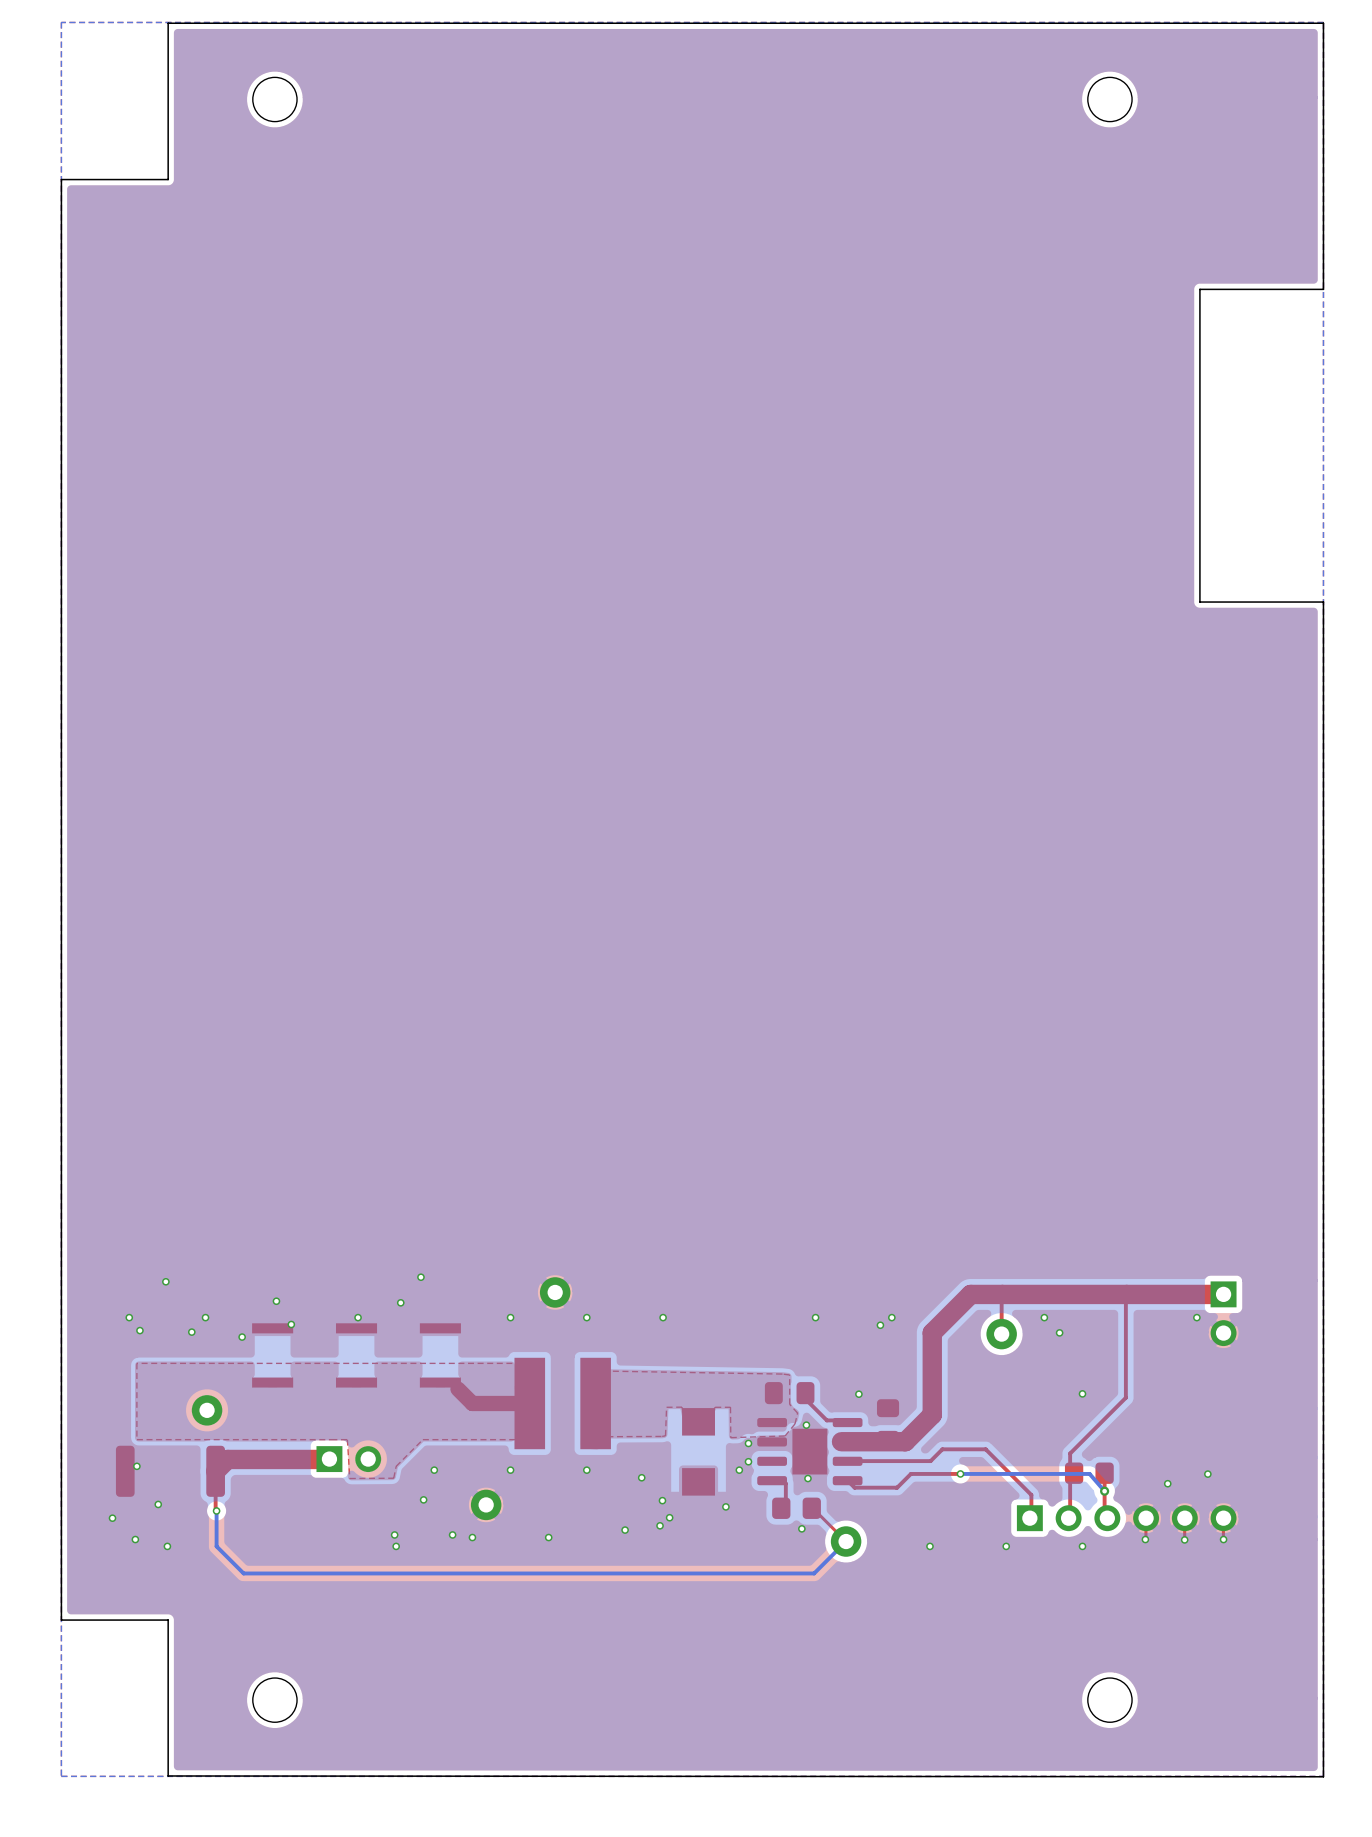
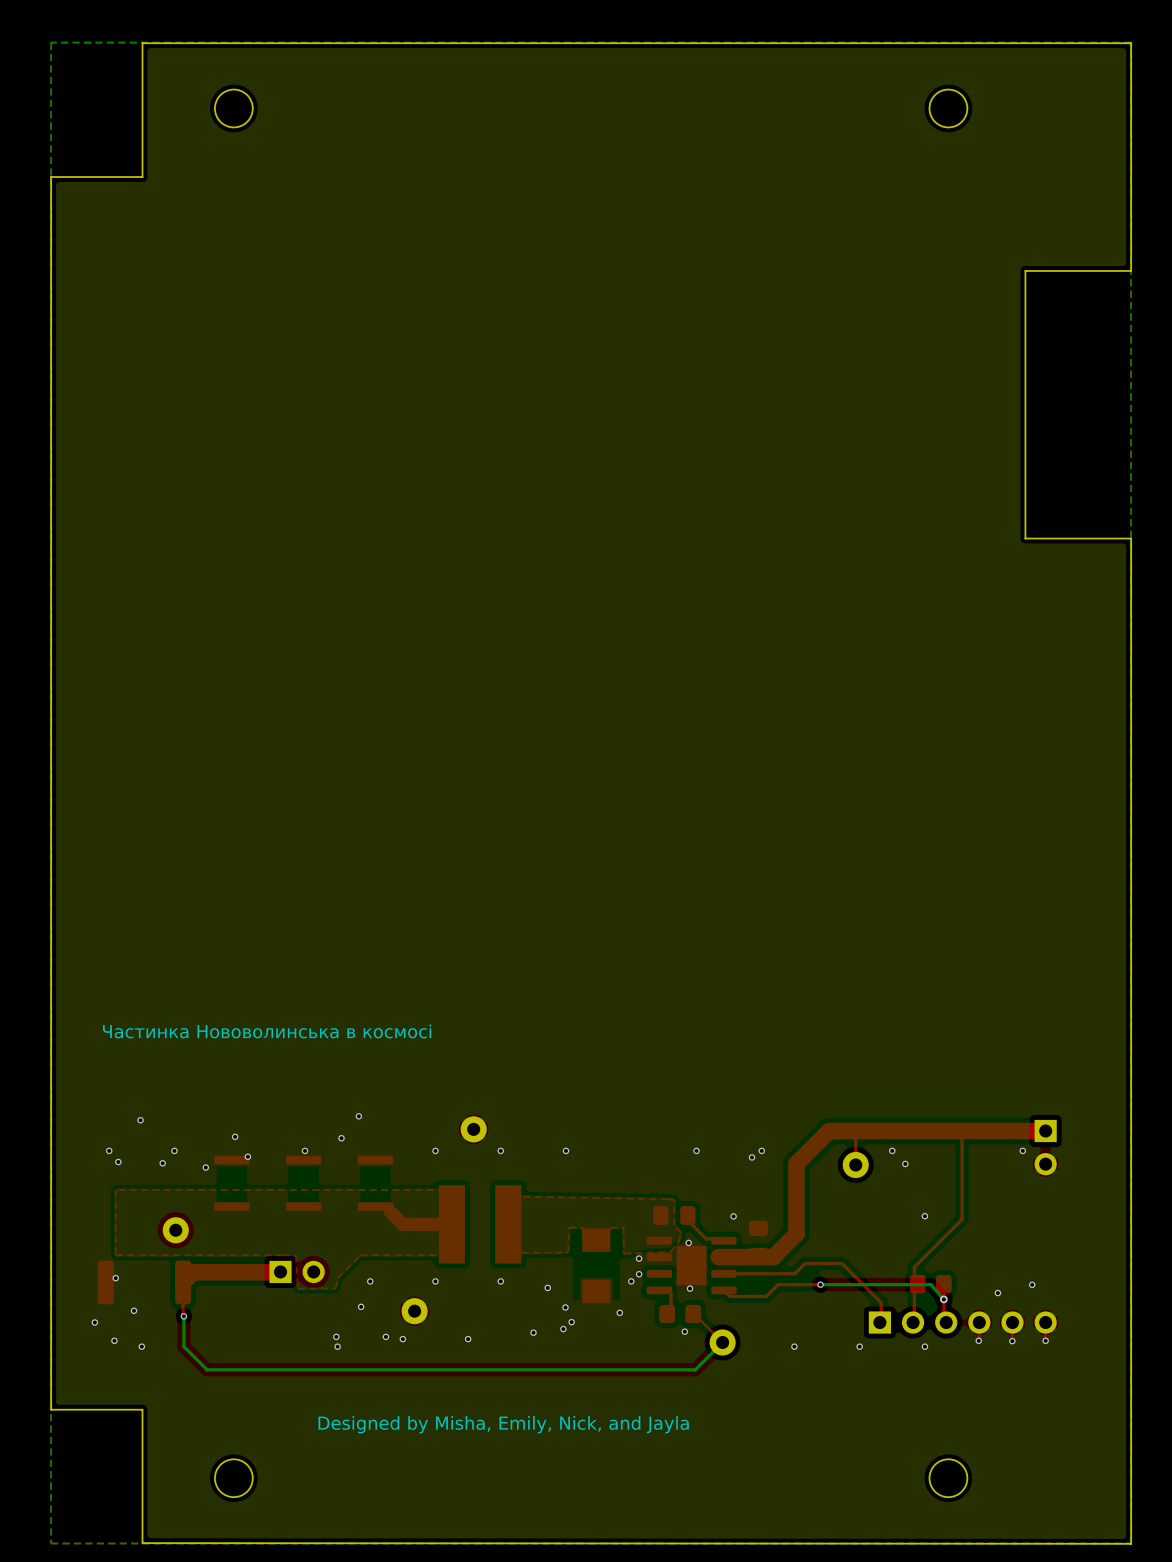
text: none -> Частинка Нововолинська в космосі (267, 1031)
text: none -> Designed by Misha, Emily, Nick, and Jayla (503, 1424)

